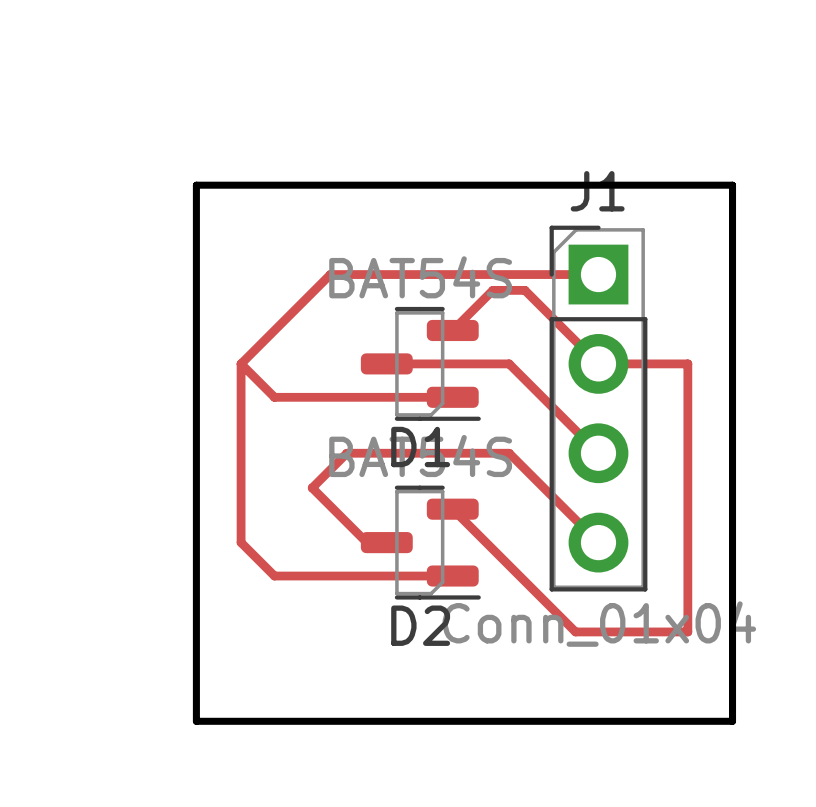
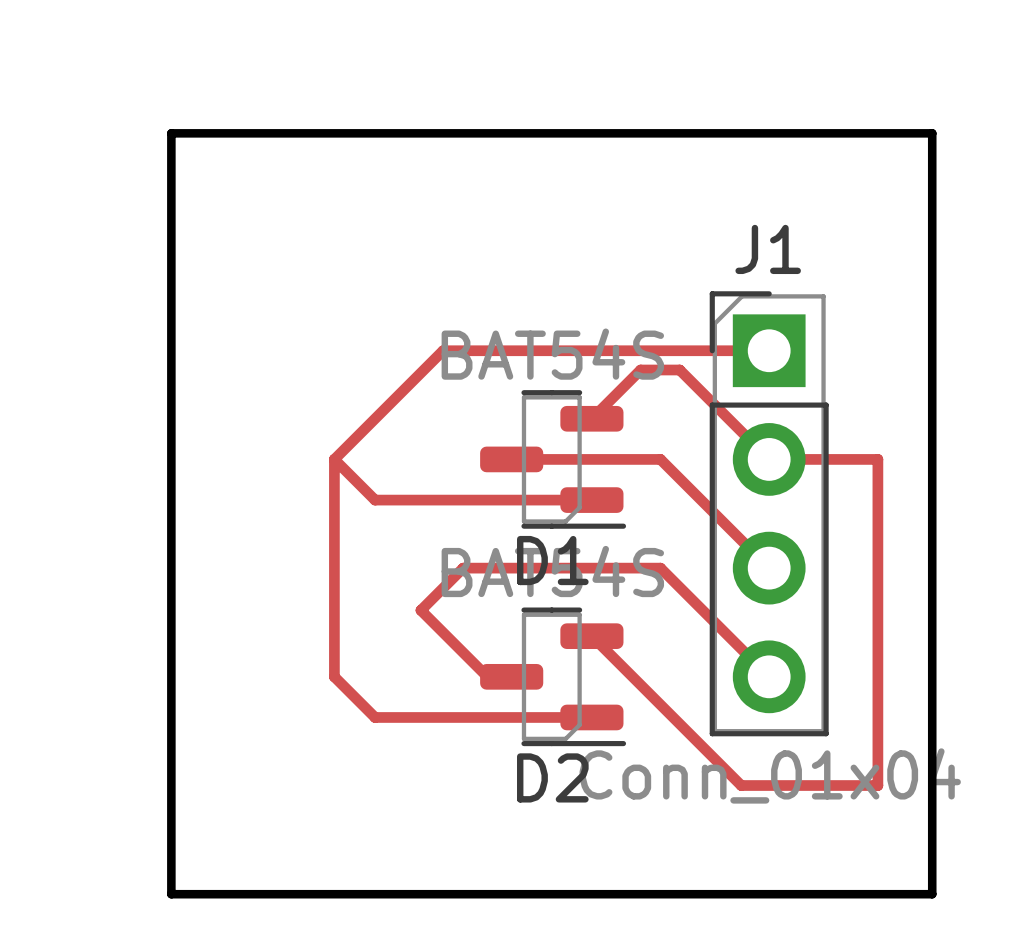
board edge: (732, 185) (196, 185) (196, 721) -> (932, 242) (932, 133) (171, 133) (171, 894) (280, 894)

